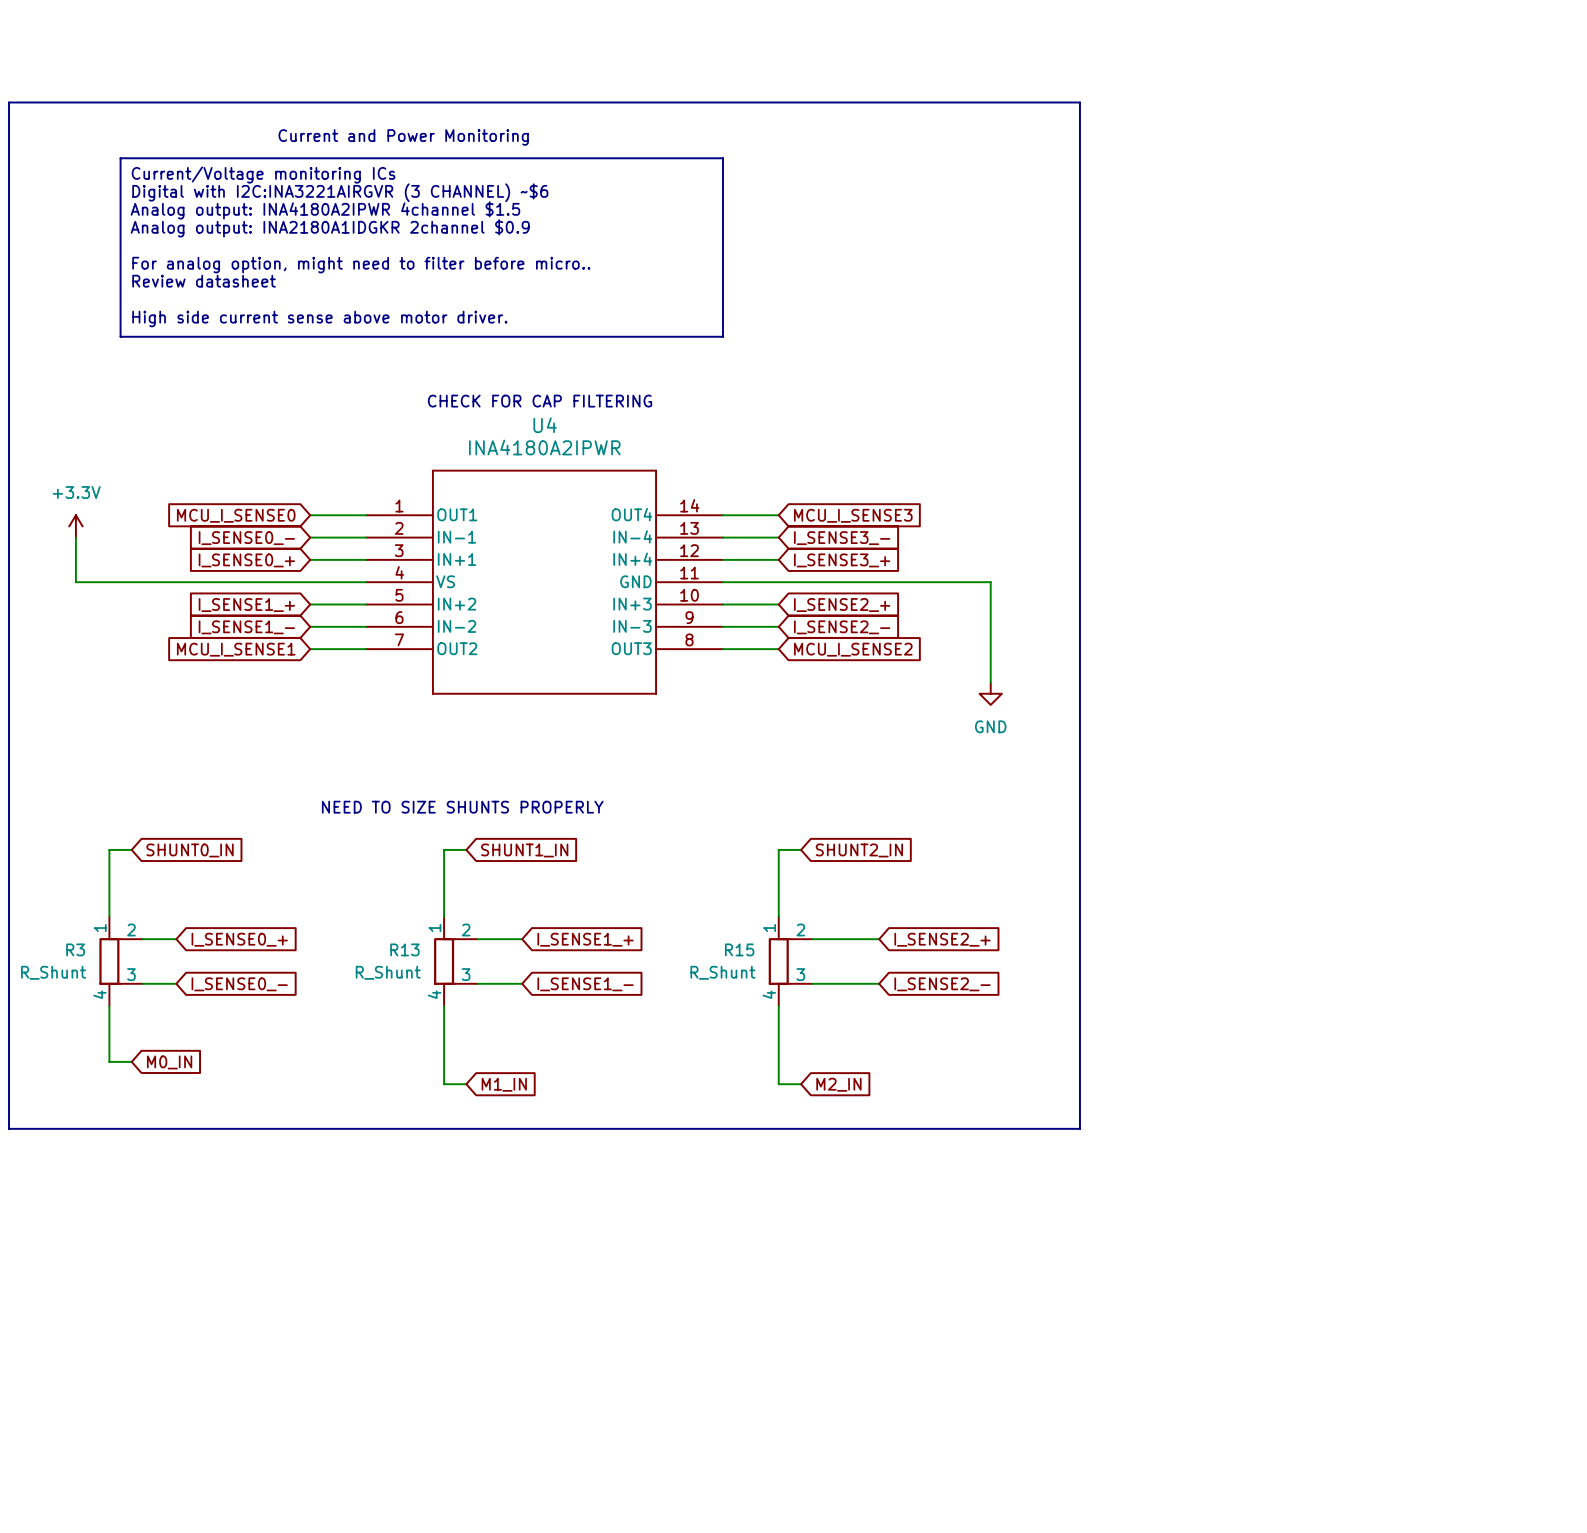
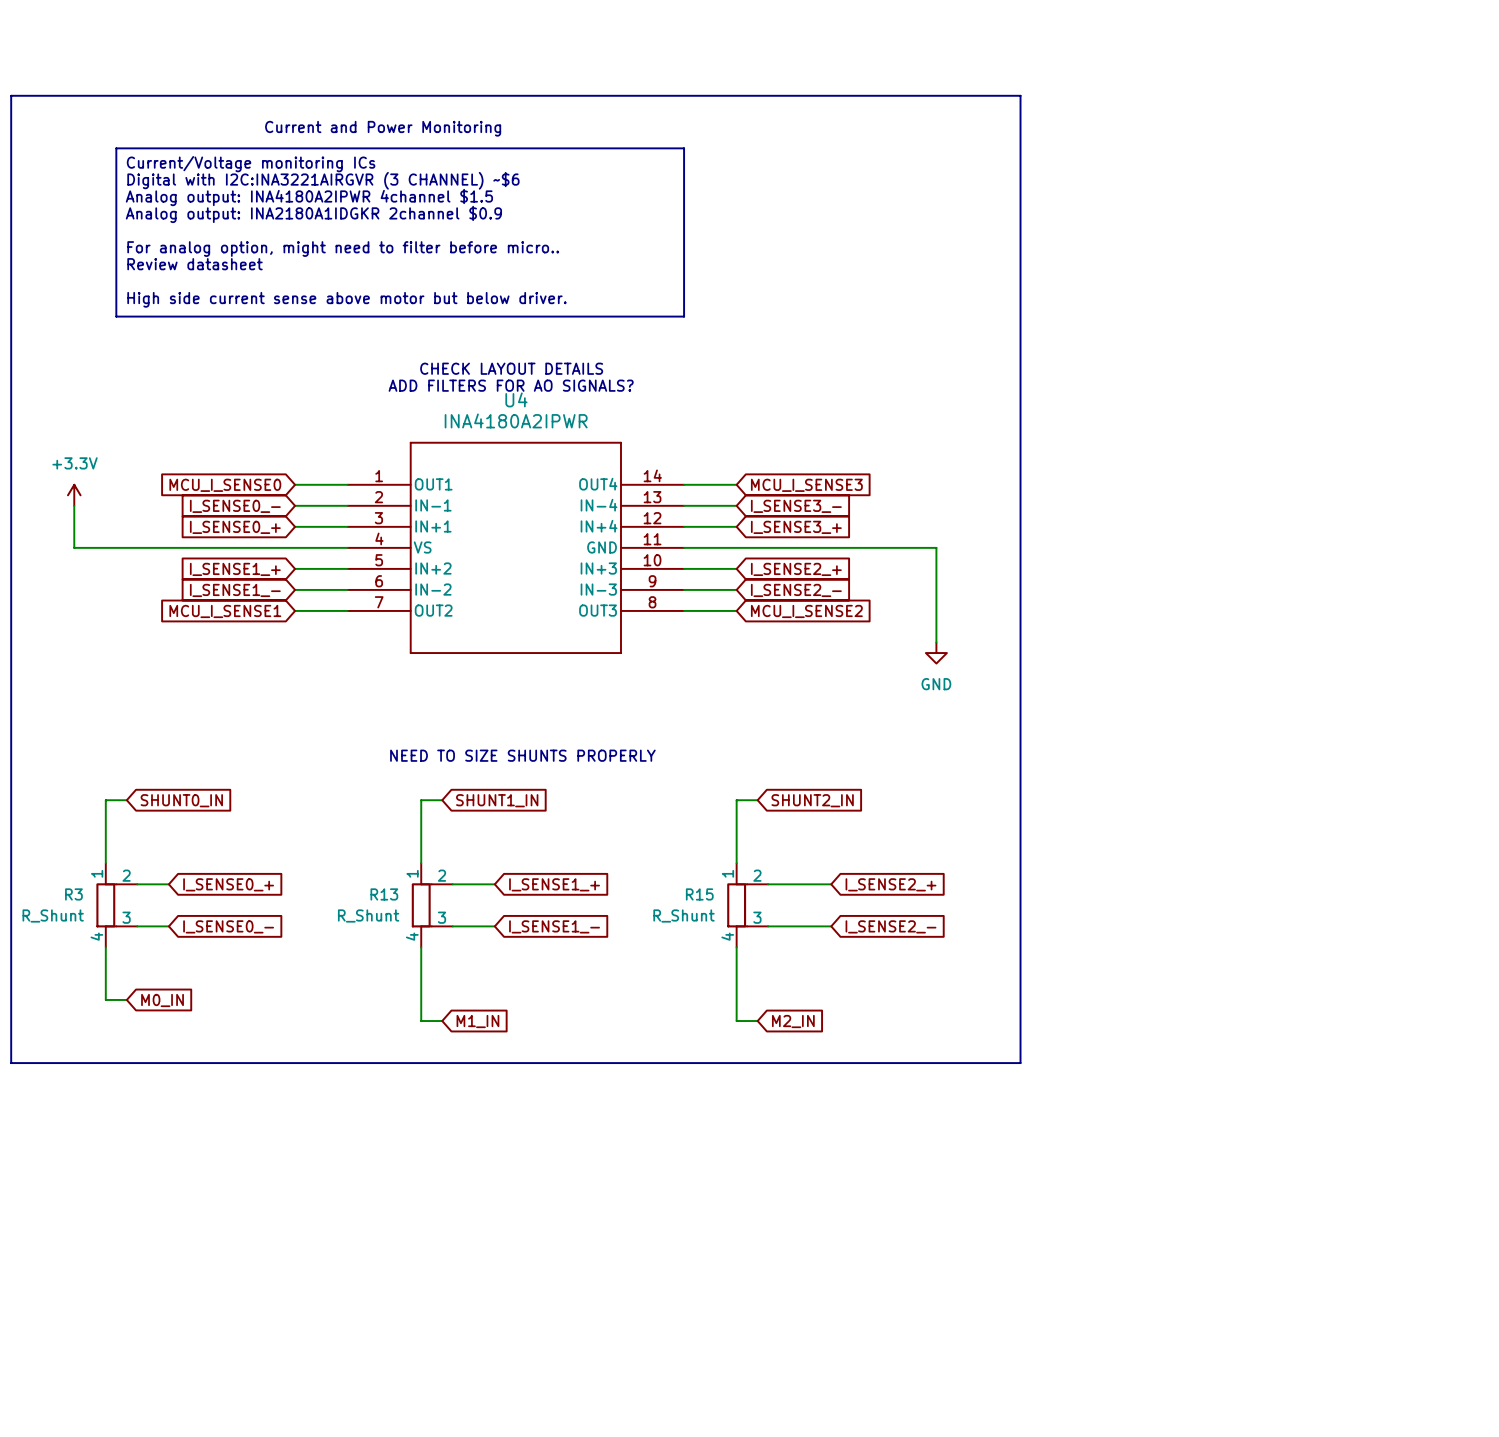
text: High side current sense above motor driver. (319, 318) -> High side current sense above motor but below driver. (346, 299)
text: none -> CHECK LAYOUT DETAILS (511, 368)
text: CHECK FOR CAP FILTERING (540, 401) -> none
text: none -> ADD FILTERS FOR AO SIGNALS? (511, 385)
text position: NEED TO SIZE SHUNTS PROPERLY (462, 807) -> NEED TO SIZE SHUNTS PROPERLY (522, 755)

